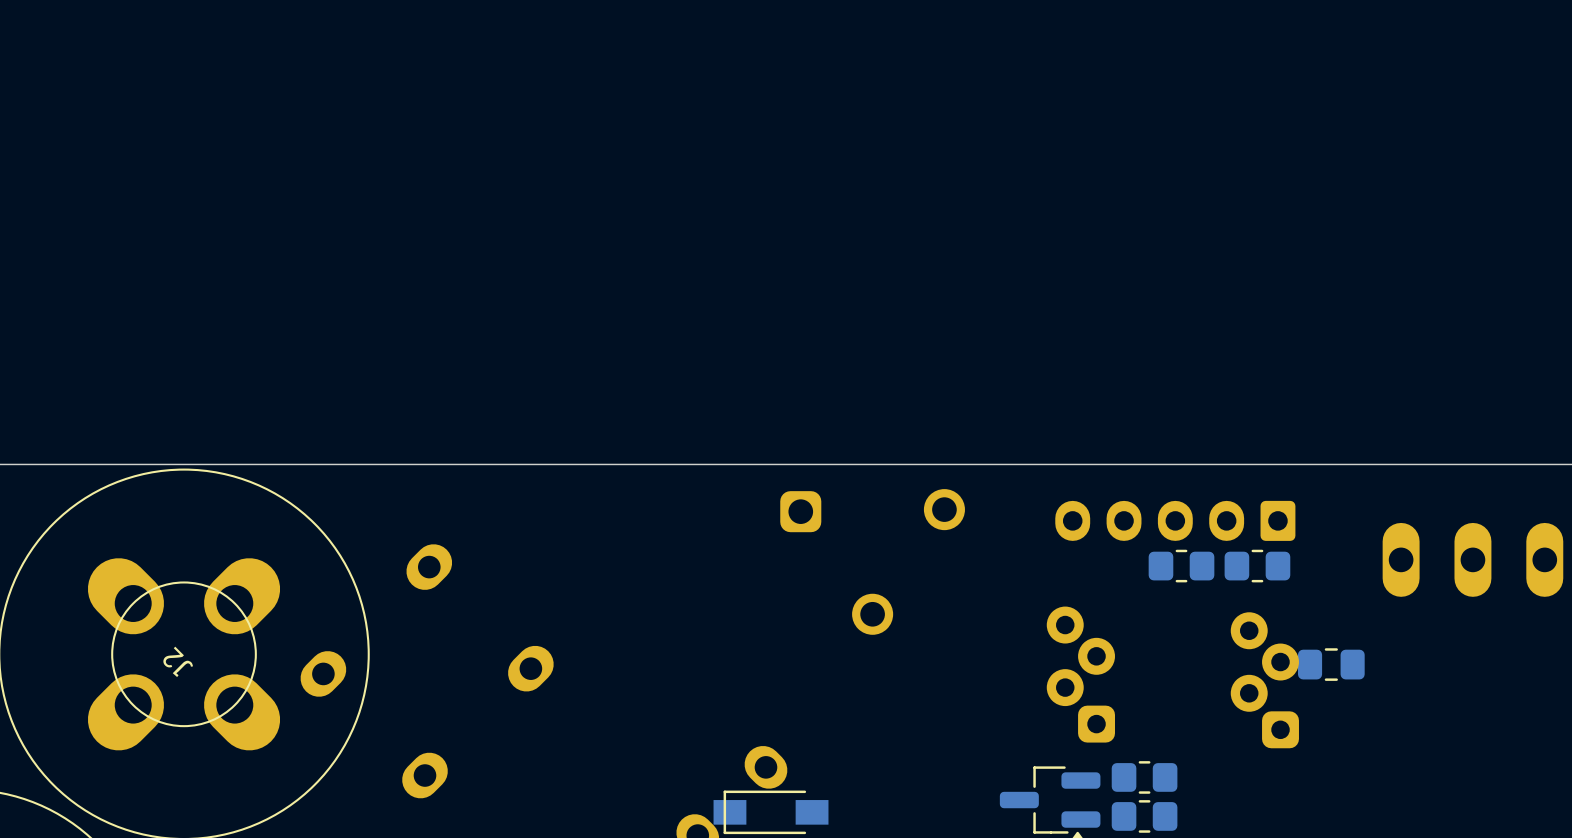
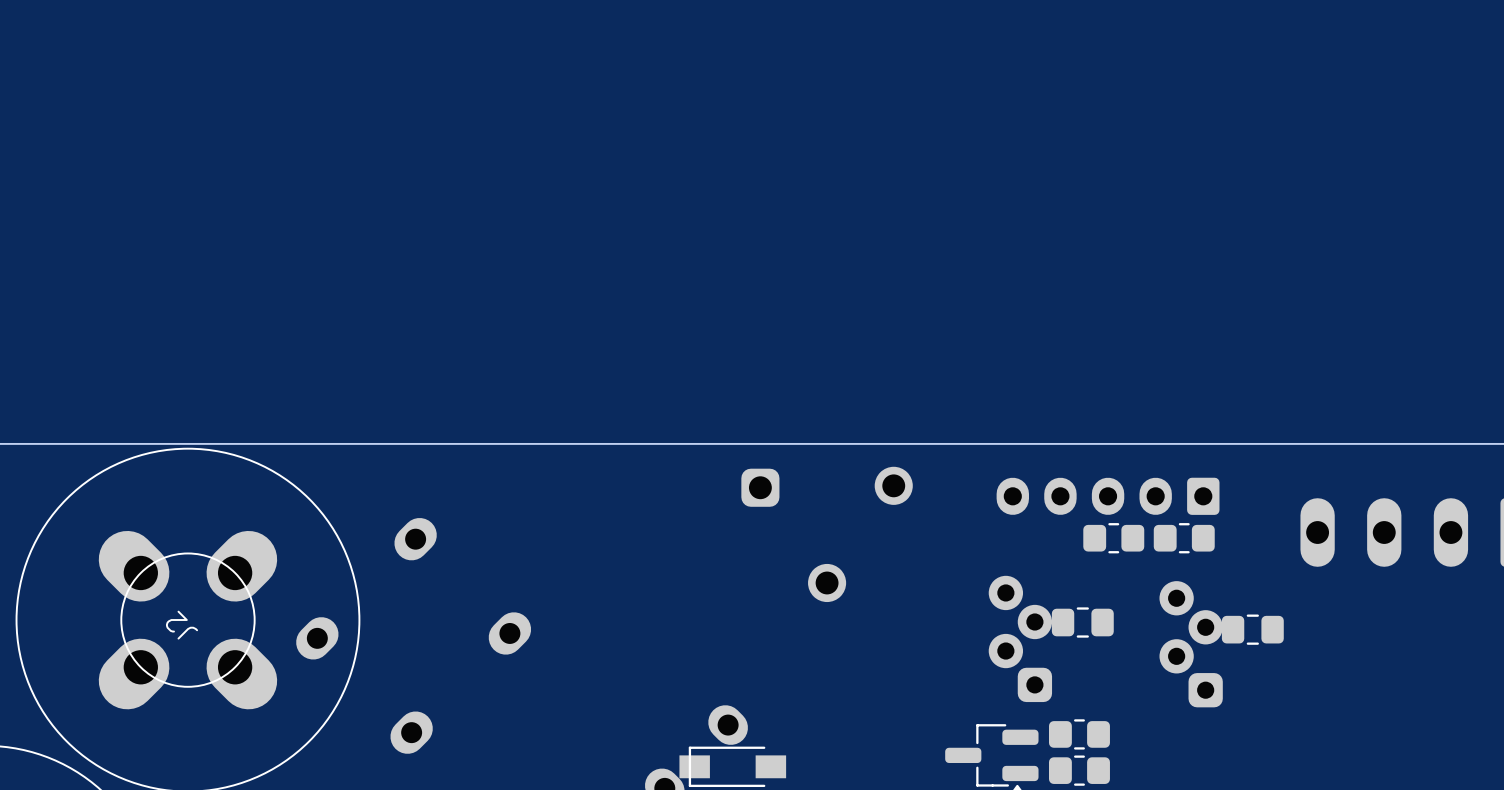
part: none -> (1082, 622)

